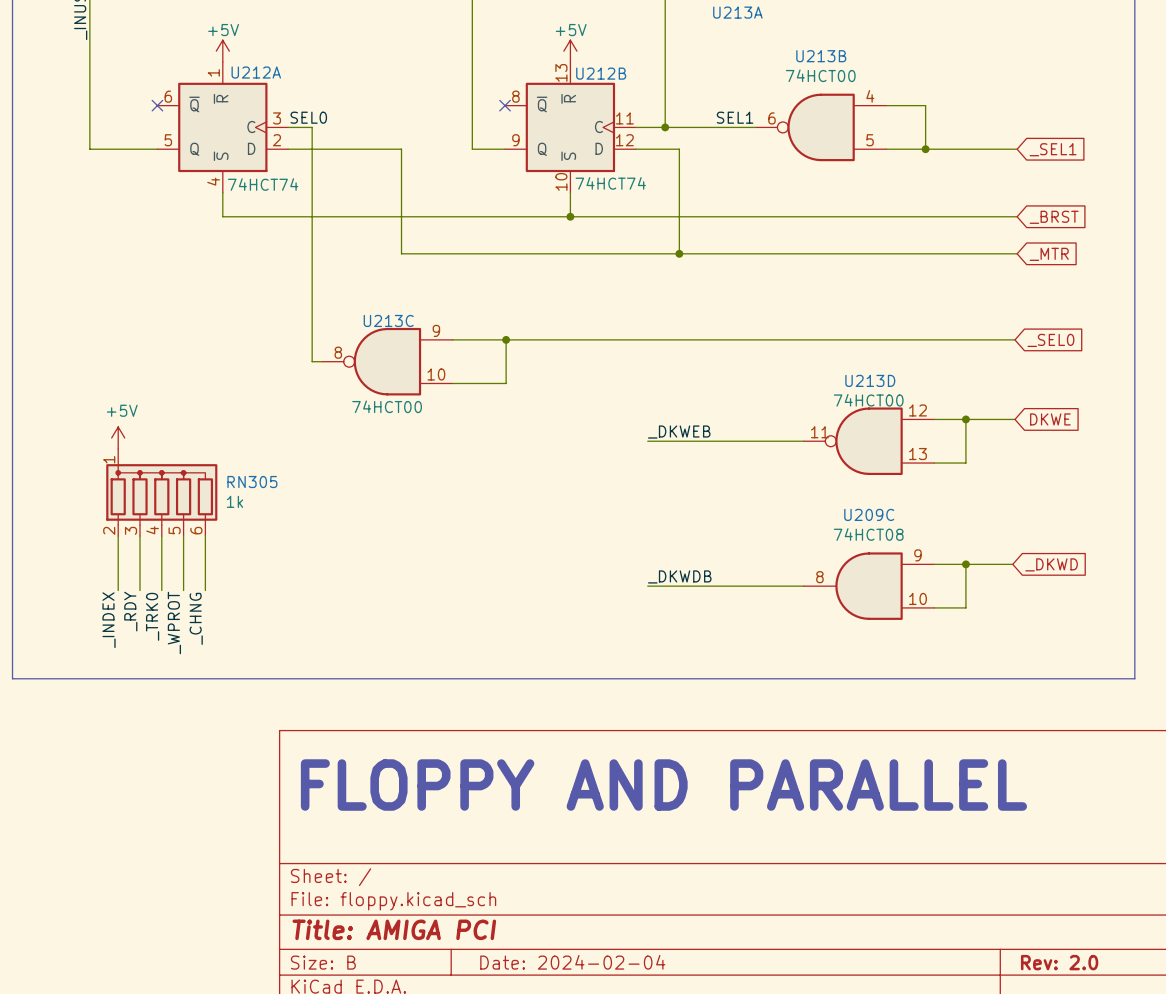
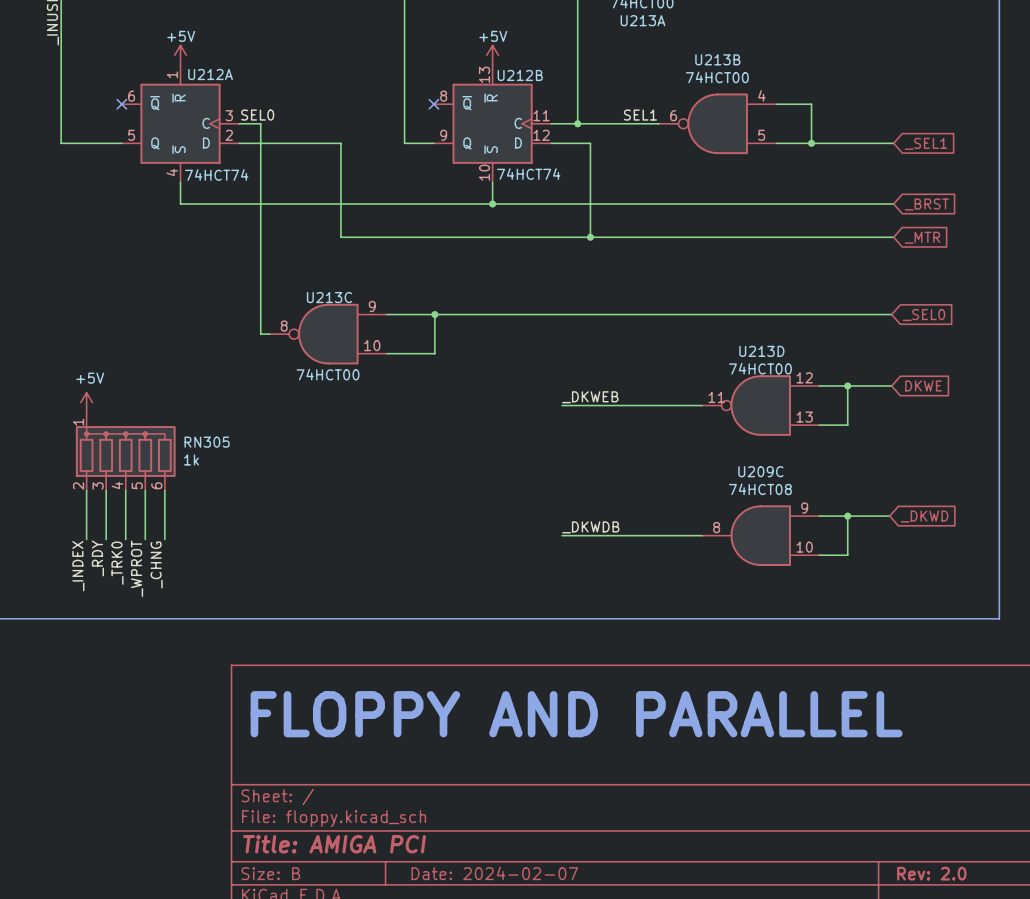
title block: Date: 2024-02-04 (572, 962) -> Date: 2024-02-07 (494, 873)

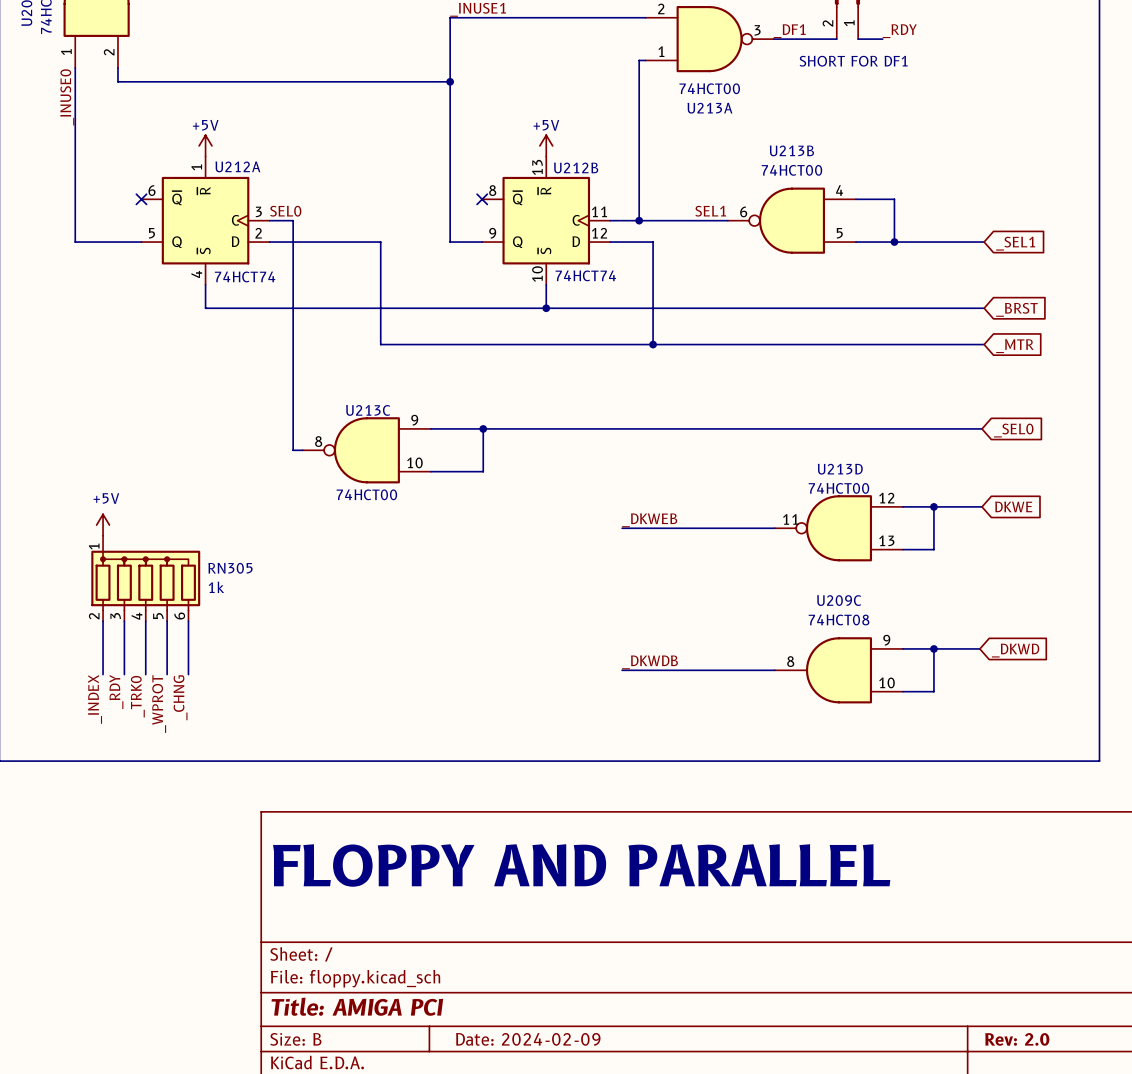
title block: Date: 2024-02-07 (494, 873) -> Date: 2024-02-09 (528, 1039)

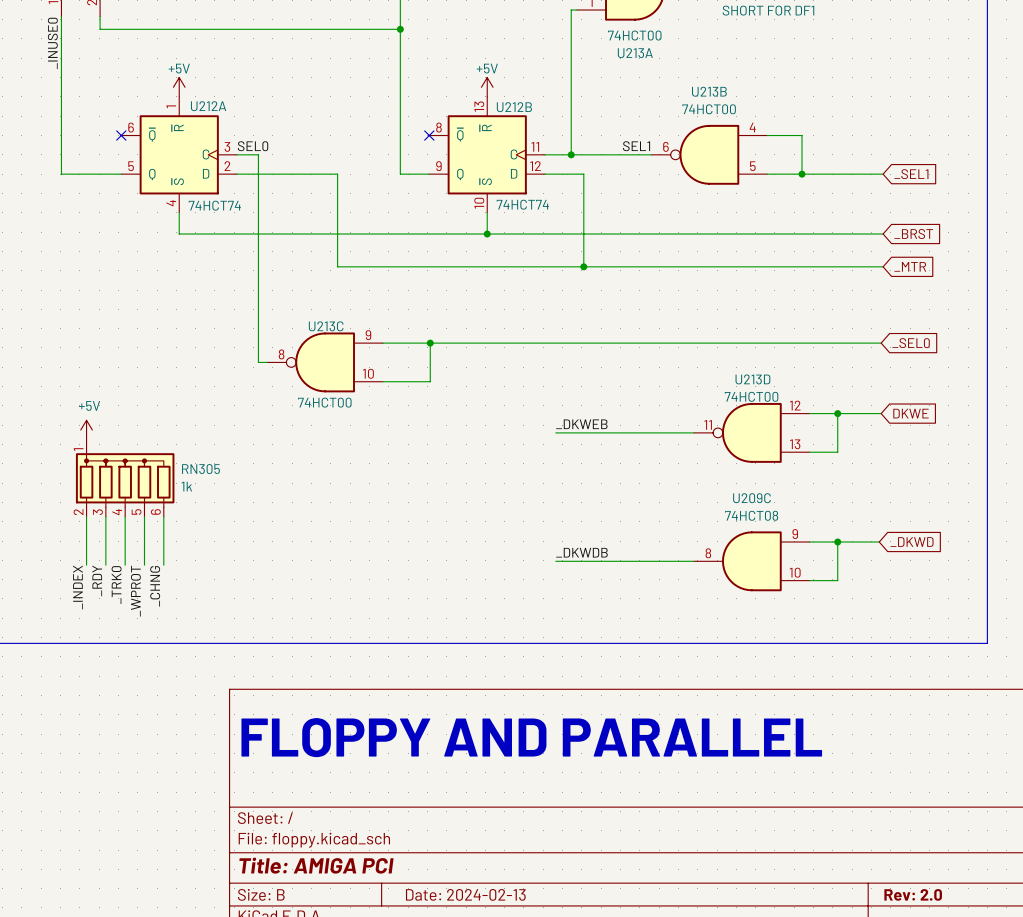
title block: Date: 2024-02-09 (528, 1039) -> Date: 2024-02-13 (465, 894)

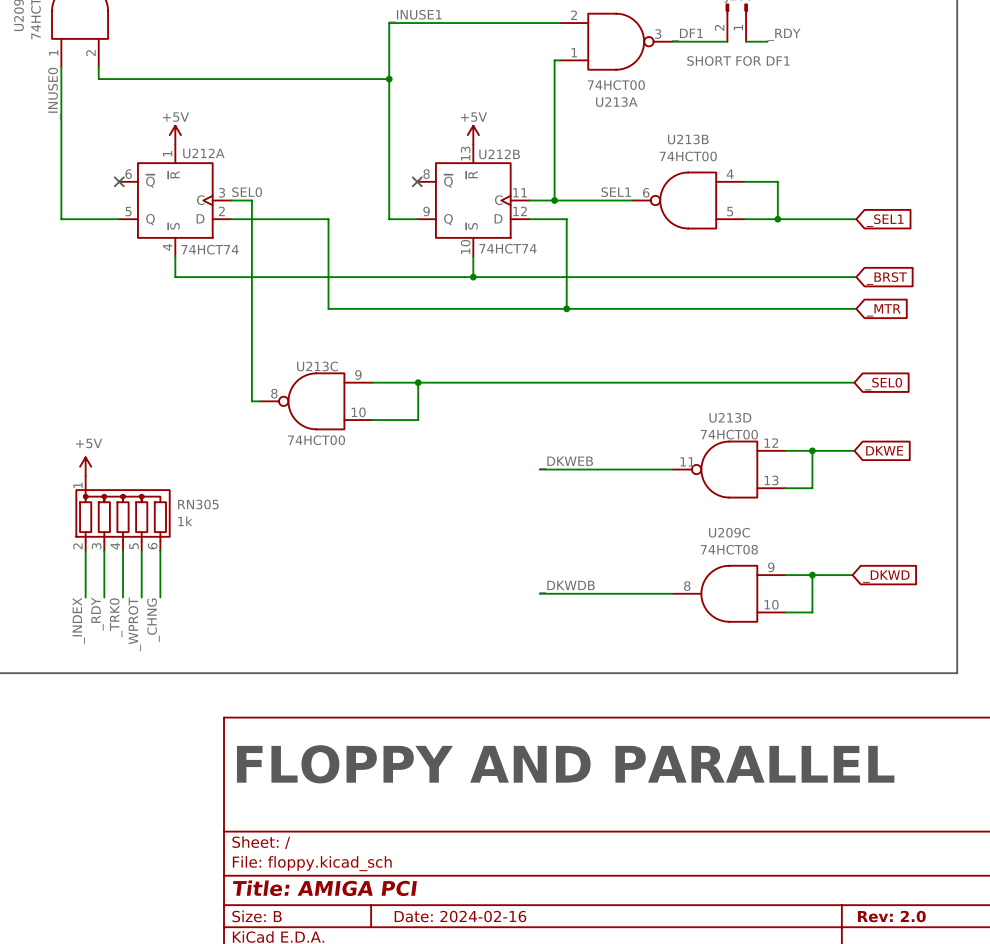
title block: Date: 2024-02-13 (465, 894) -> Date: 2024-02-16 (460, 916)

